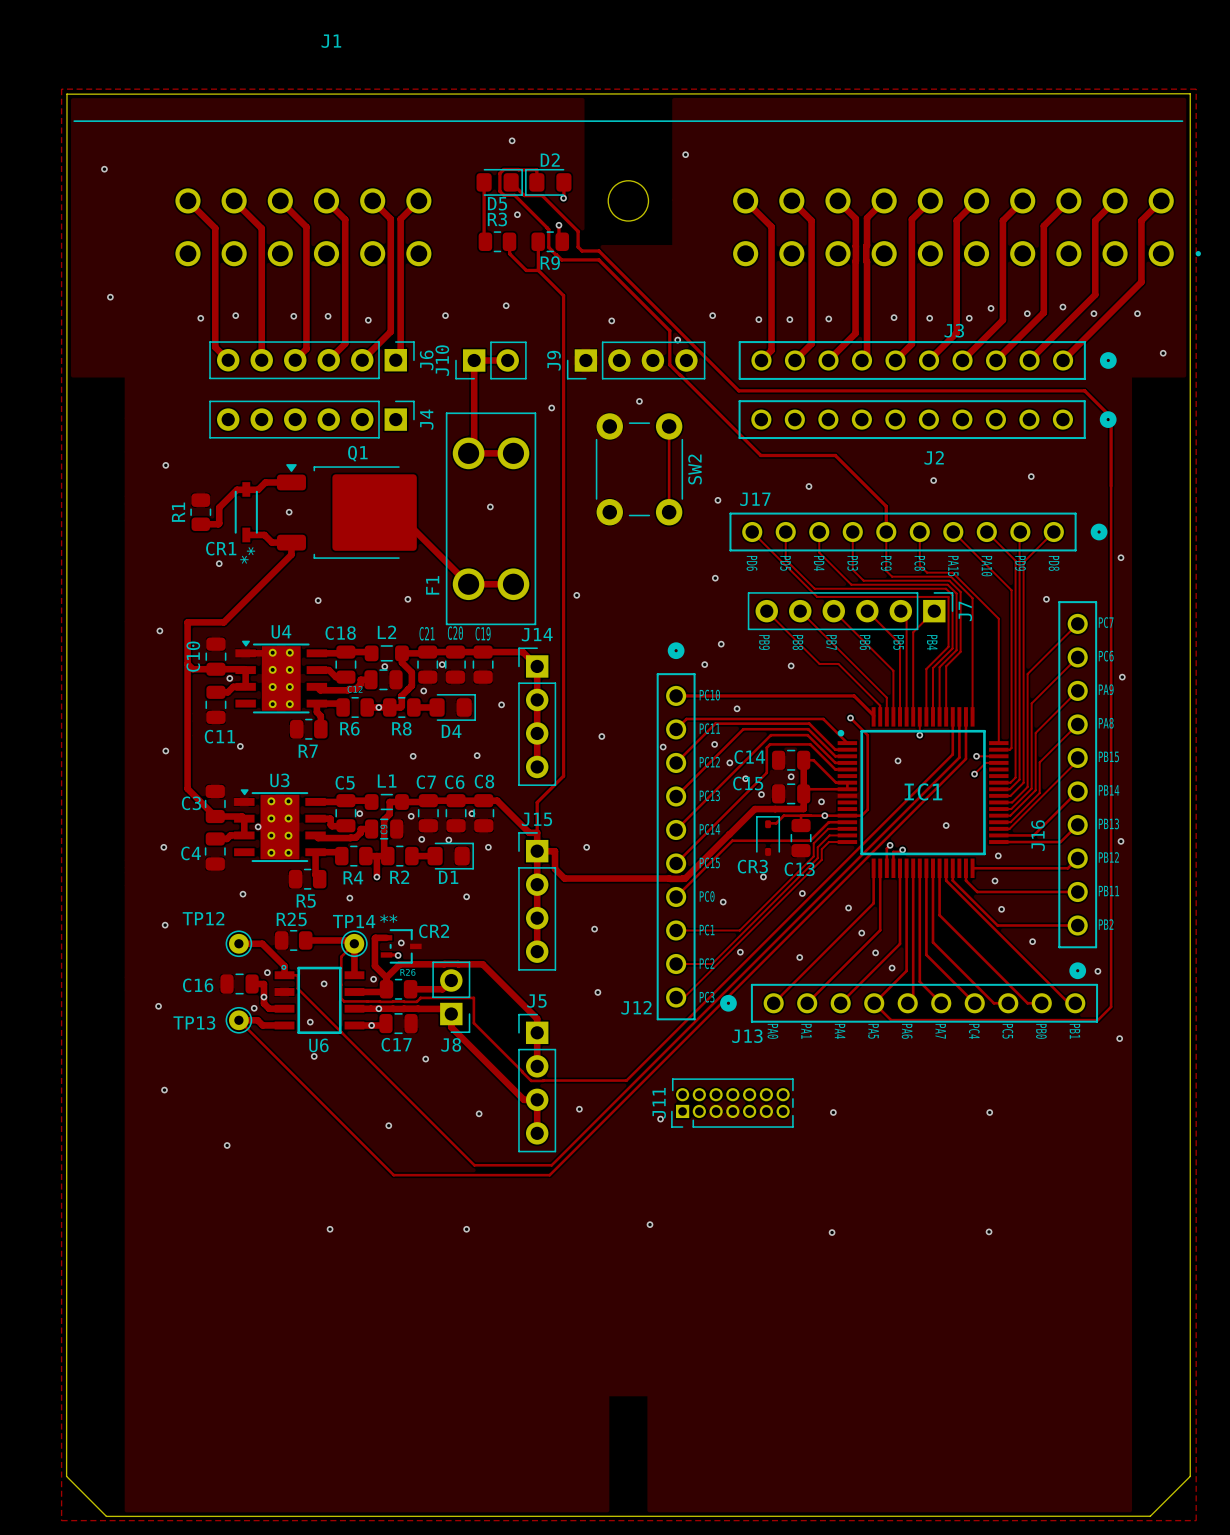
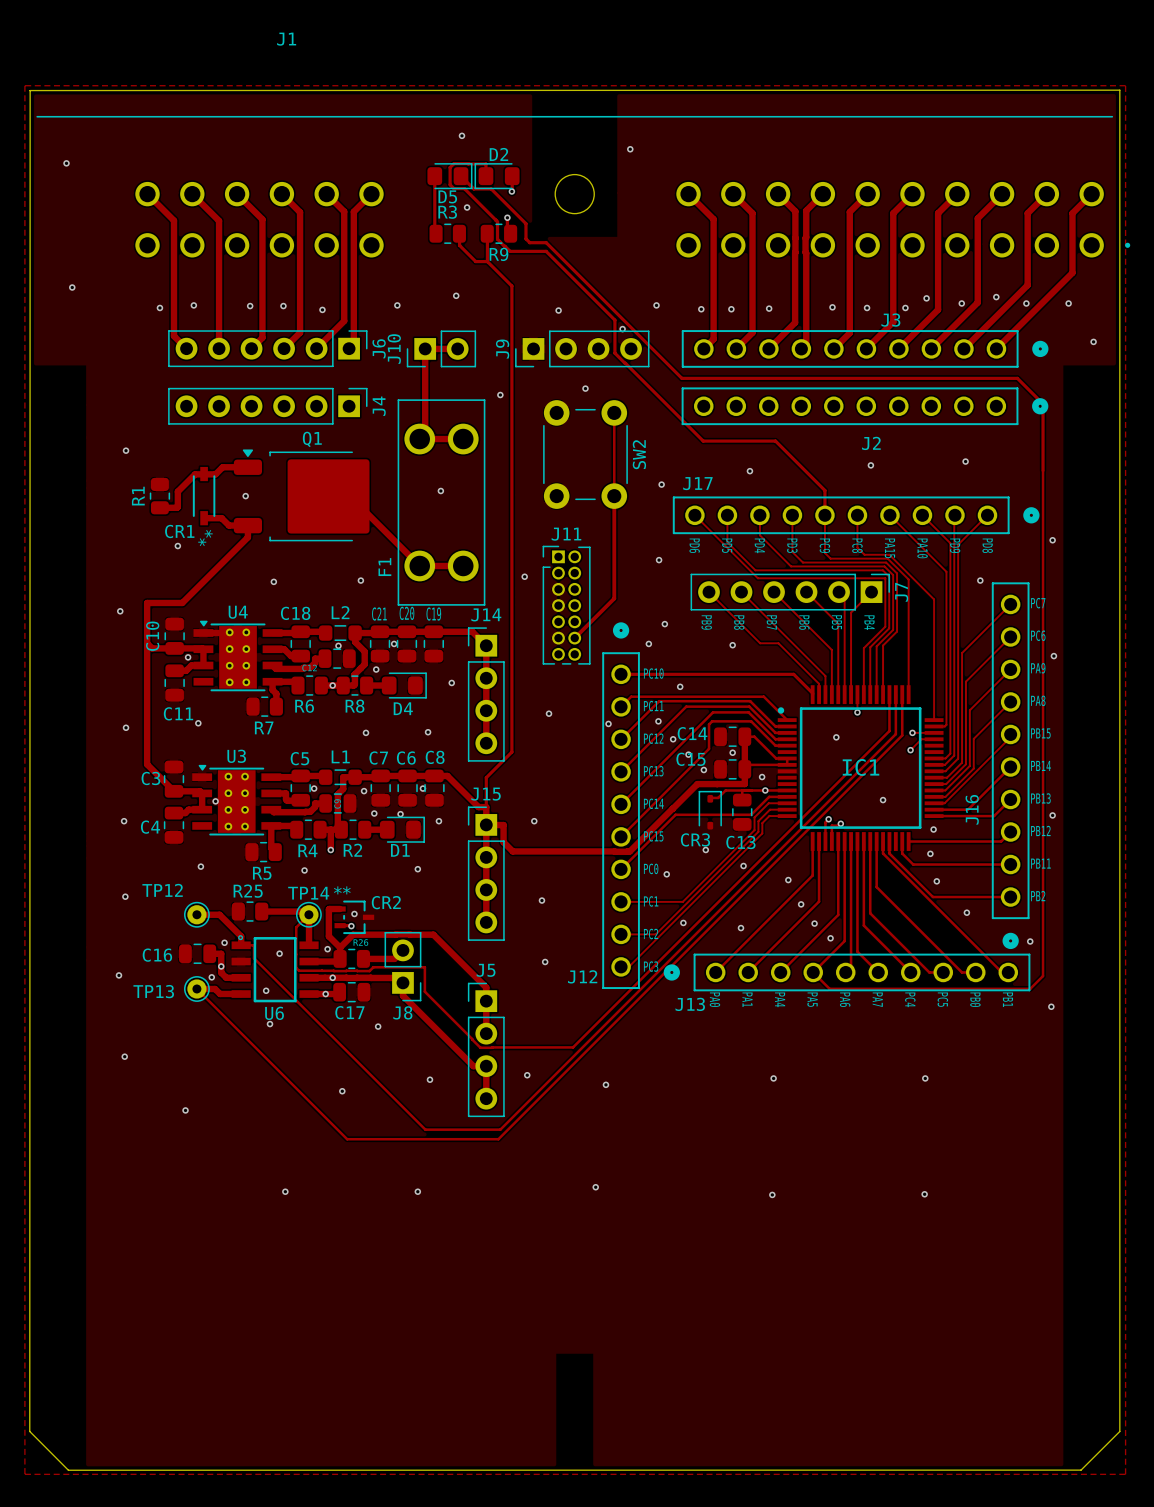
track: none -> (614, 496) (614, 598) (574, 638)
track: (850, 718) (867, 735) (867, 809) (861, 815) (847, 815) -> none
via: (850, 718) -> none
J11 rotation: 0° (732, 1103) -> 90° clockwise (566, 605)
J11 position: (732, 1103) -> (566, 605)

